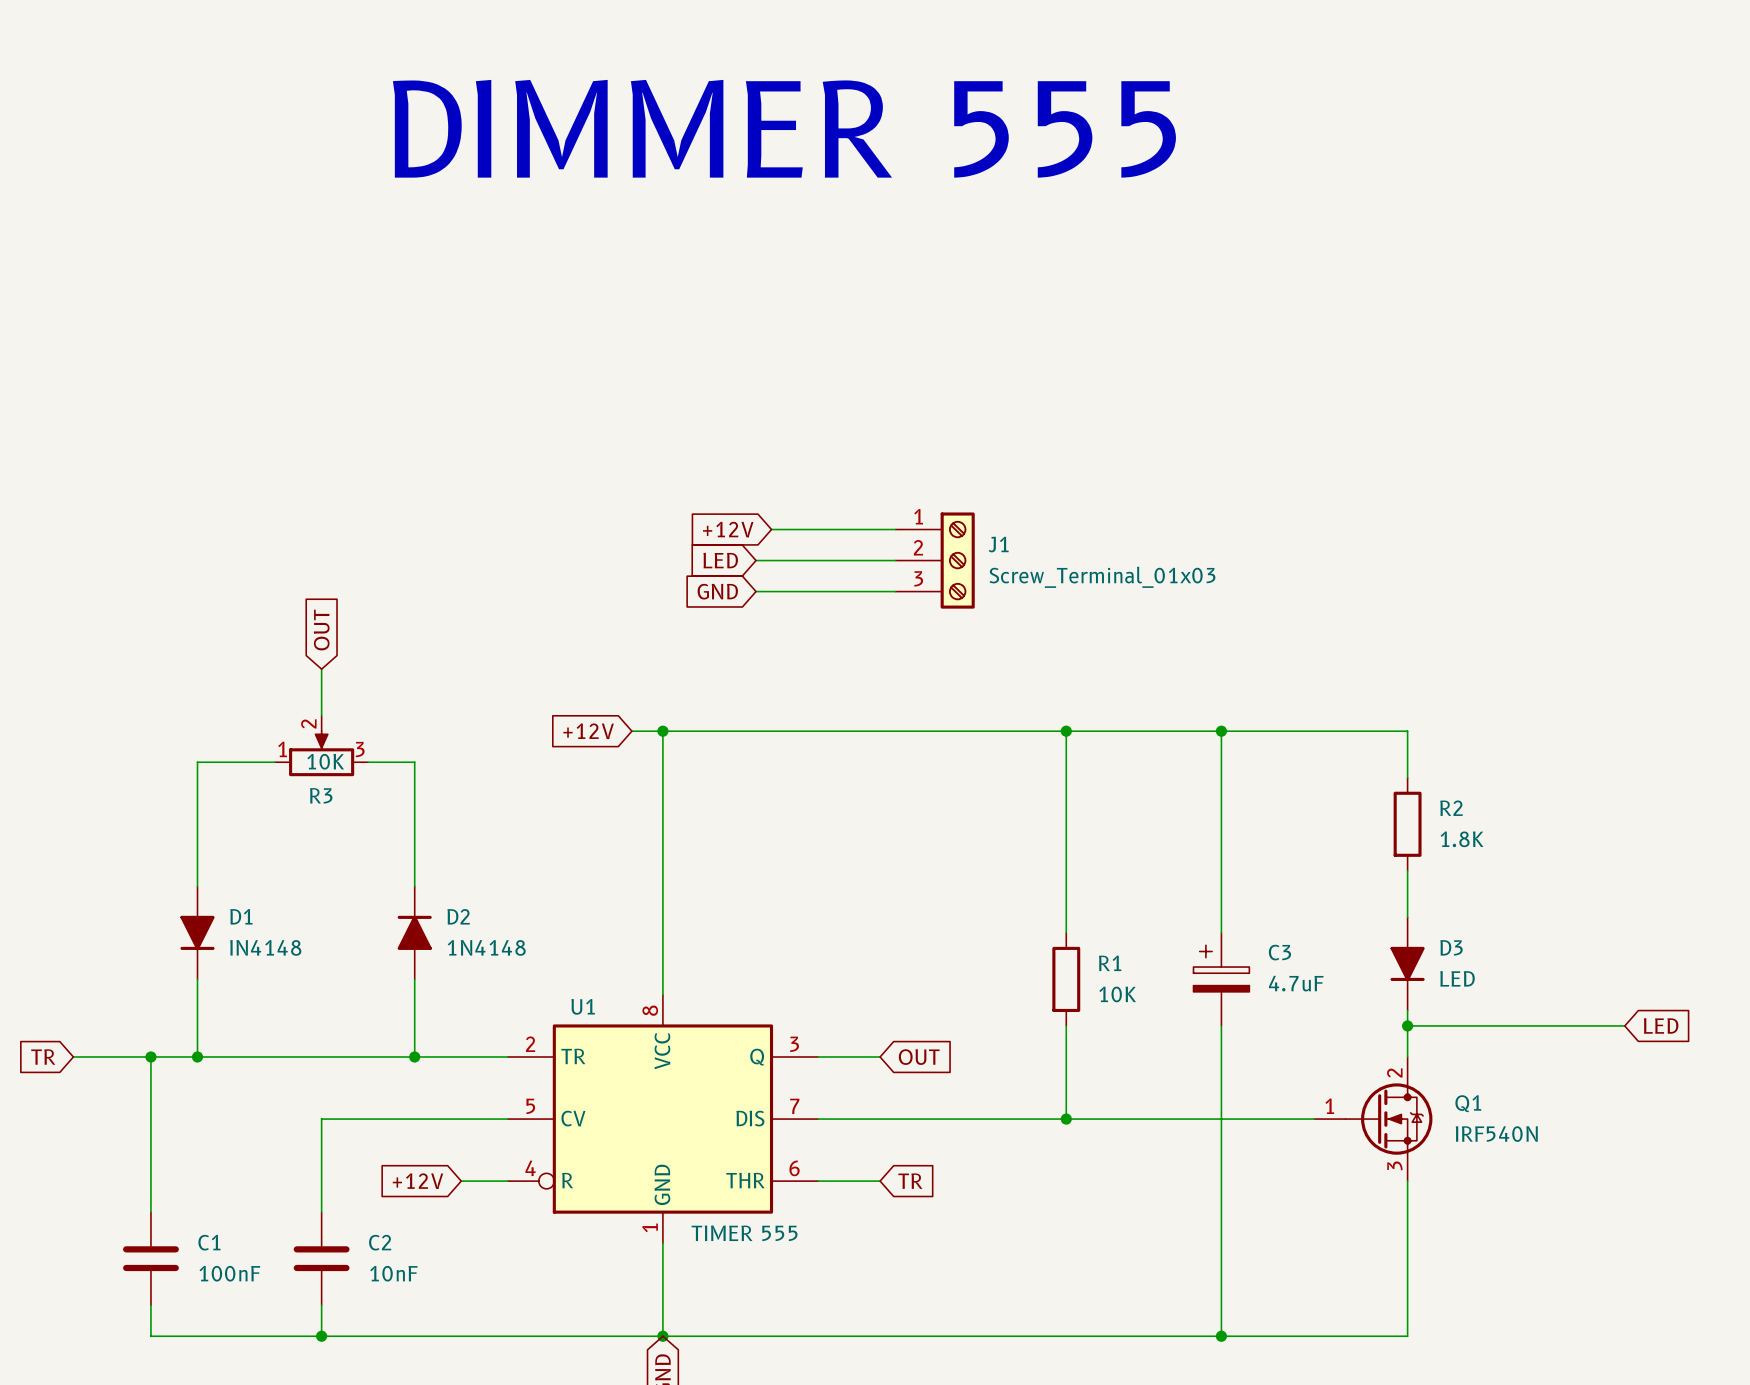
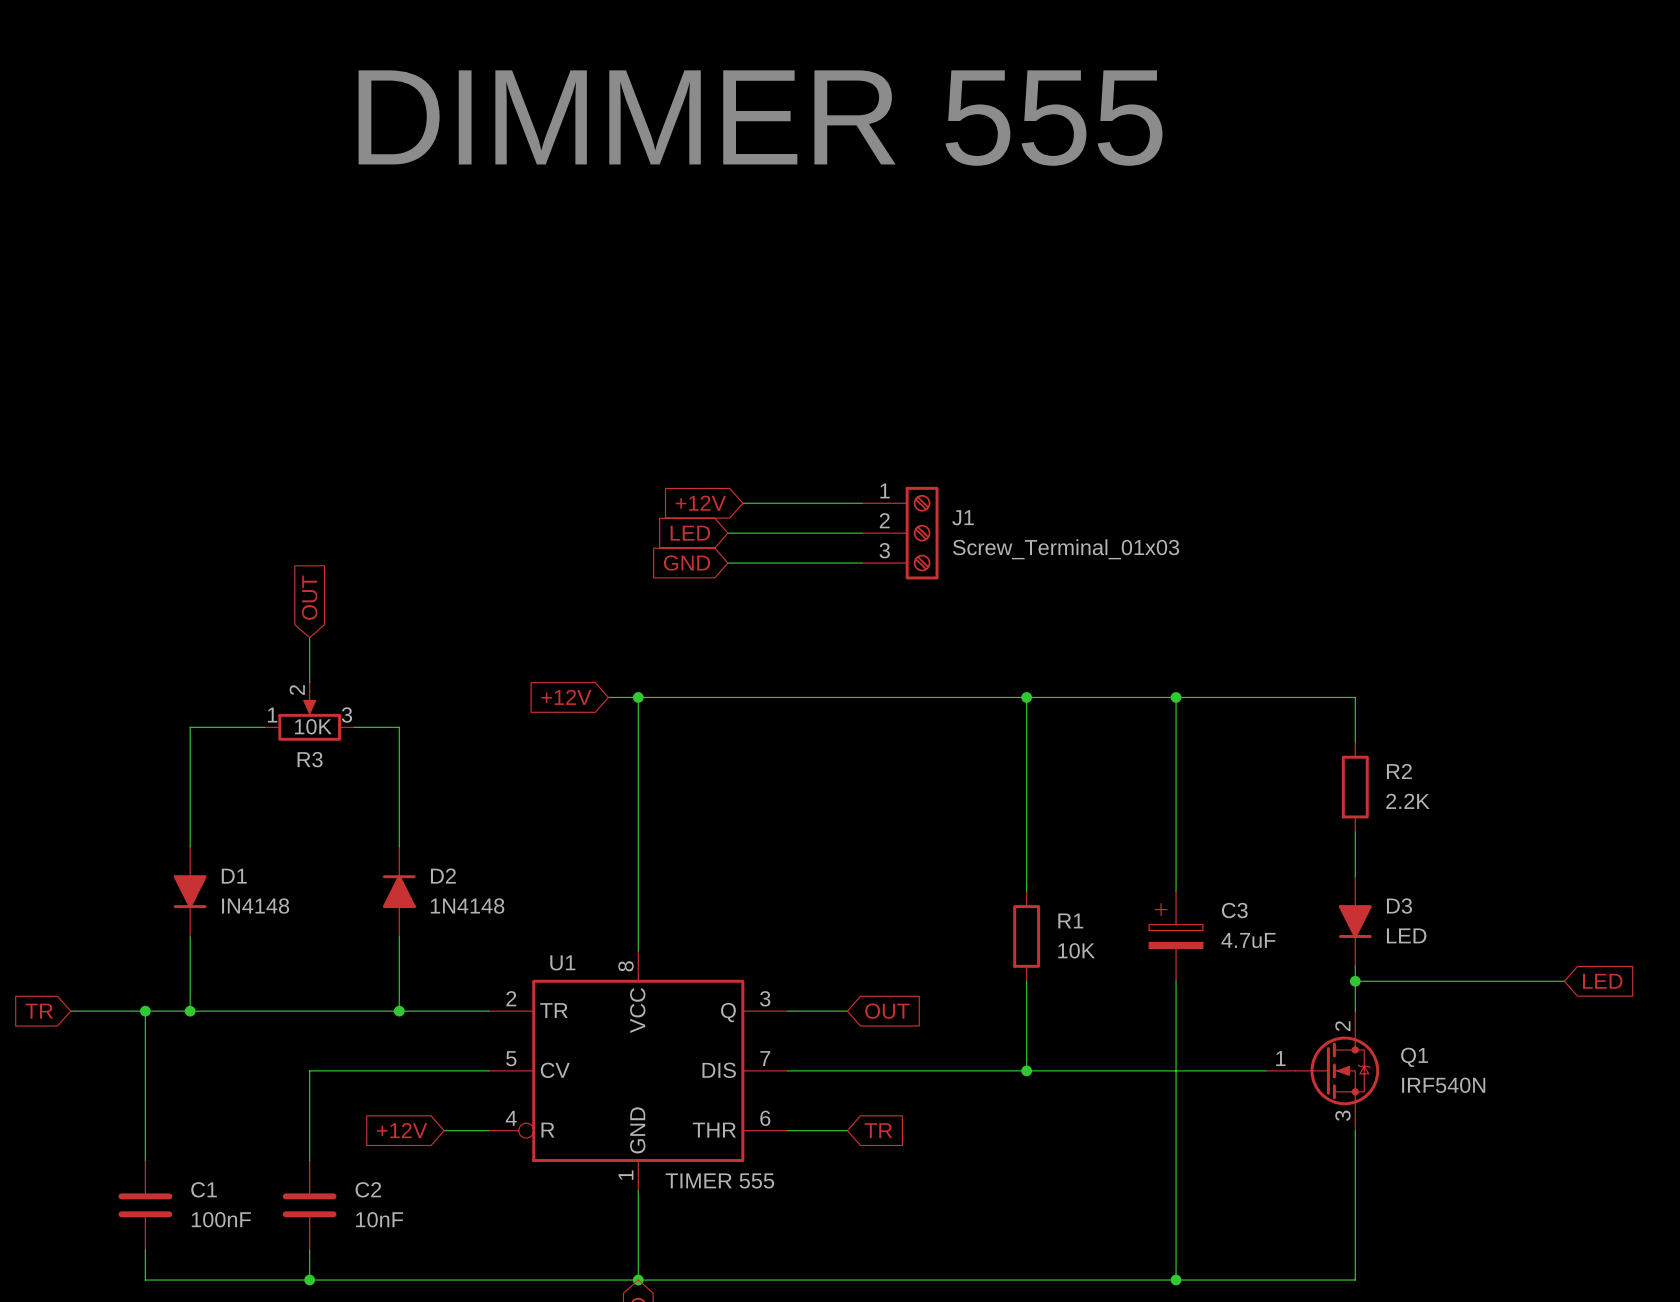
R2 value: 1.8K (1462, 839) -> 2.2K (1407, 801)

